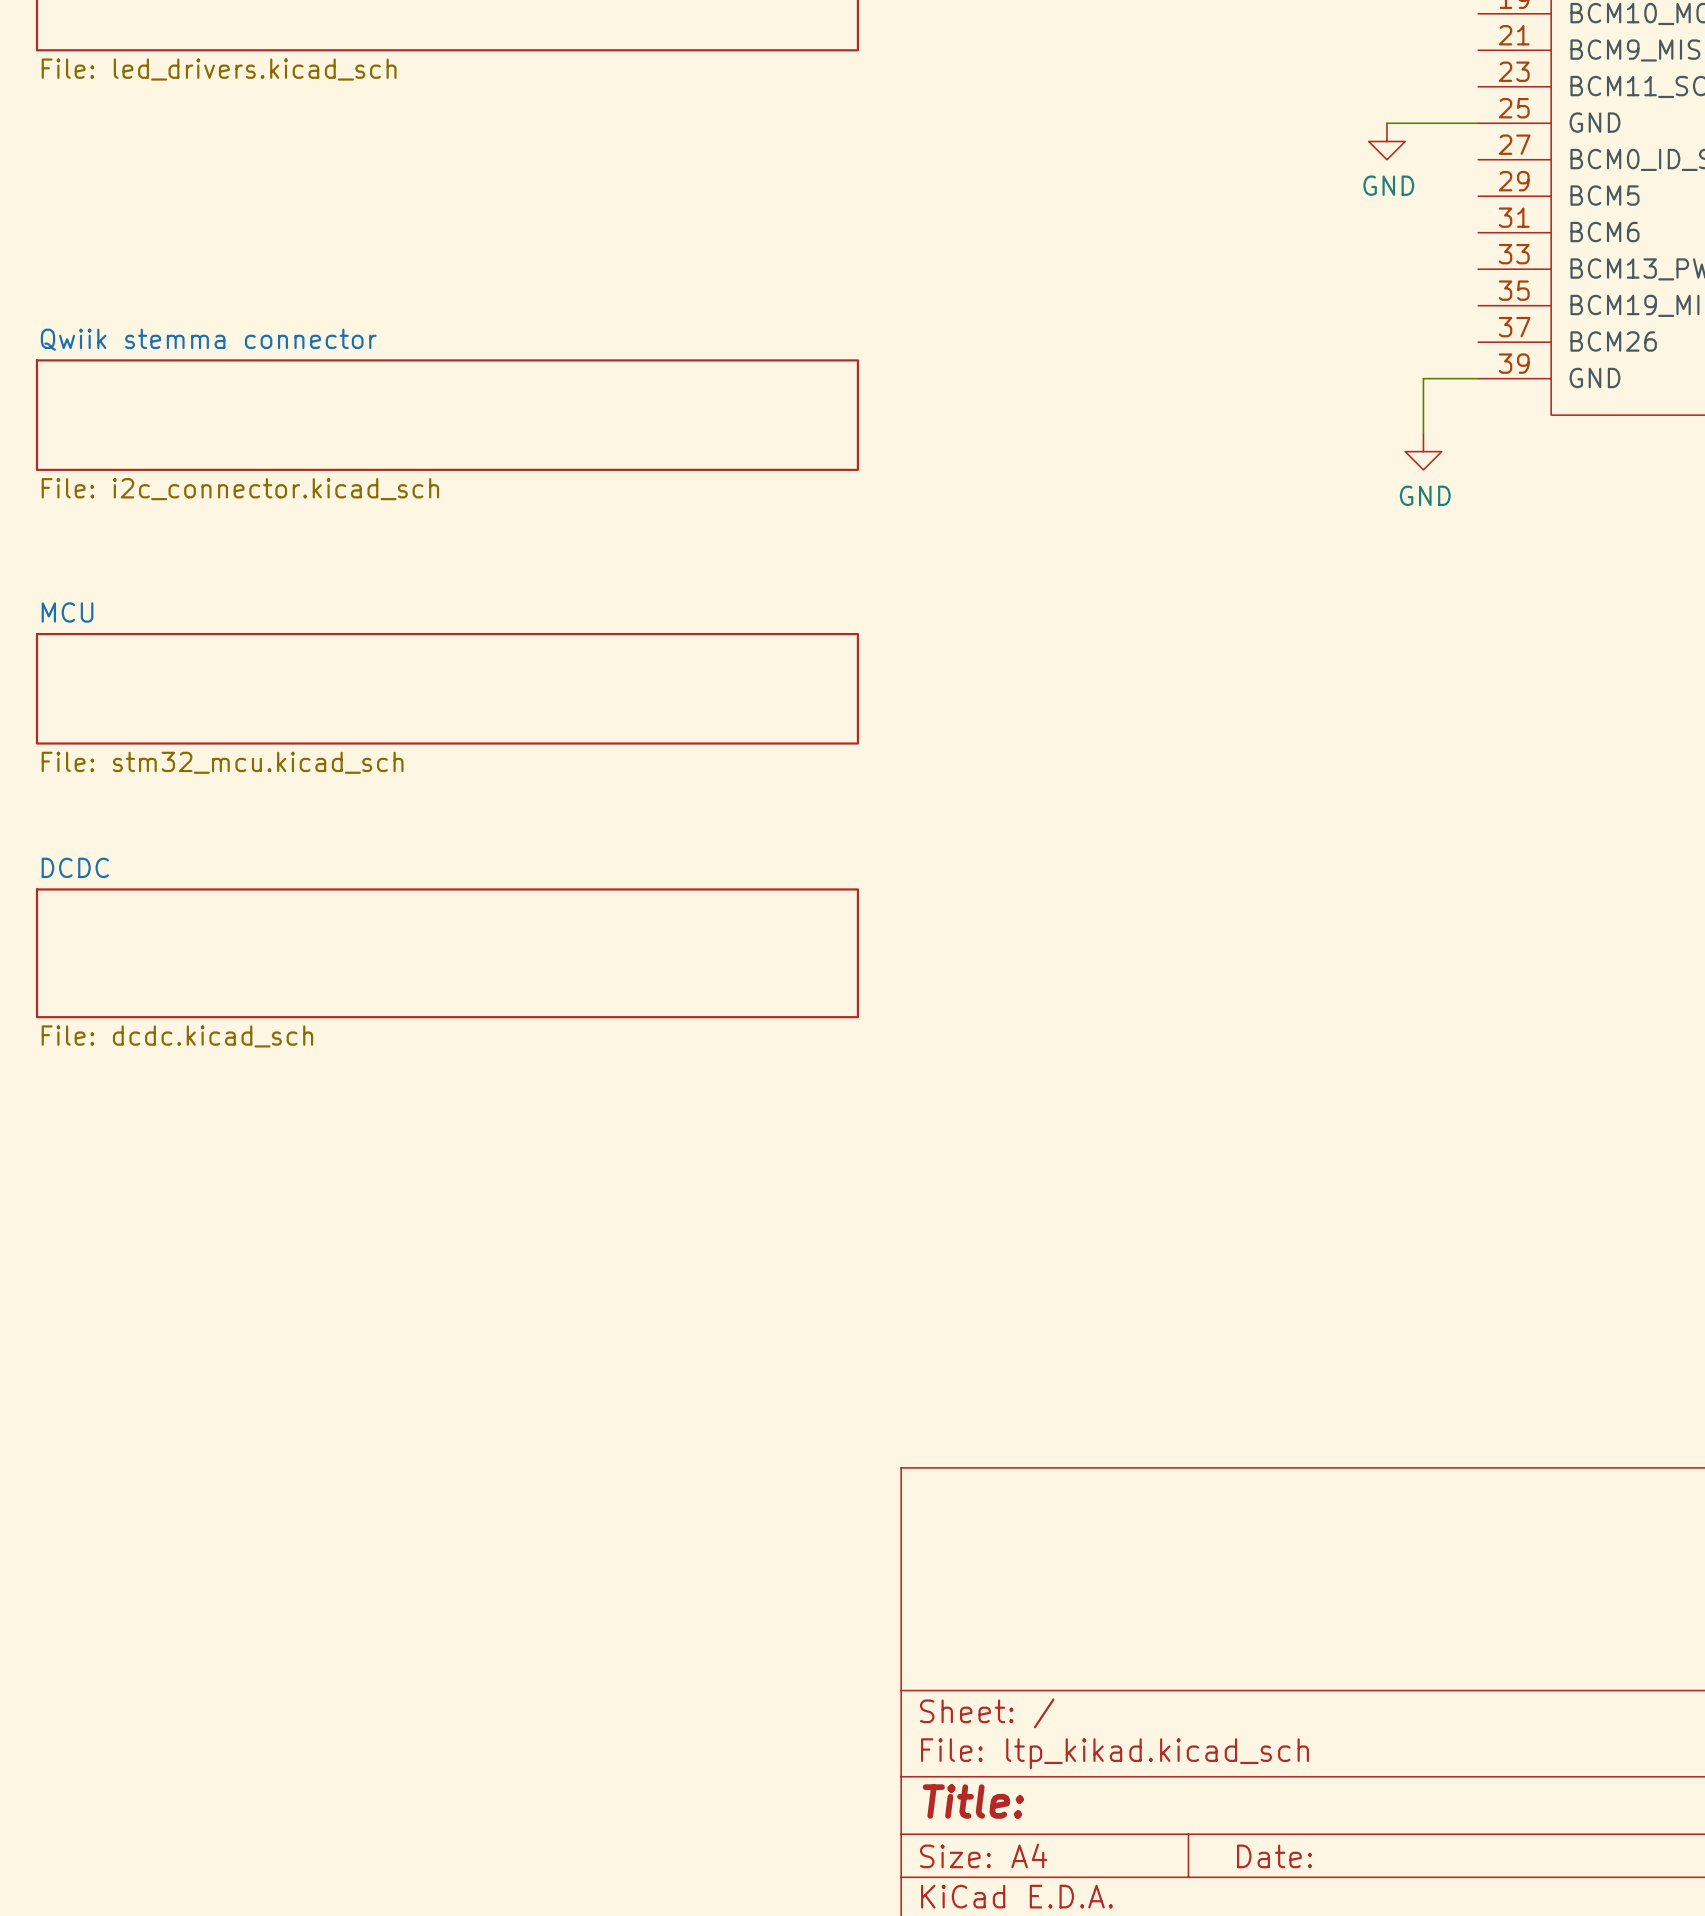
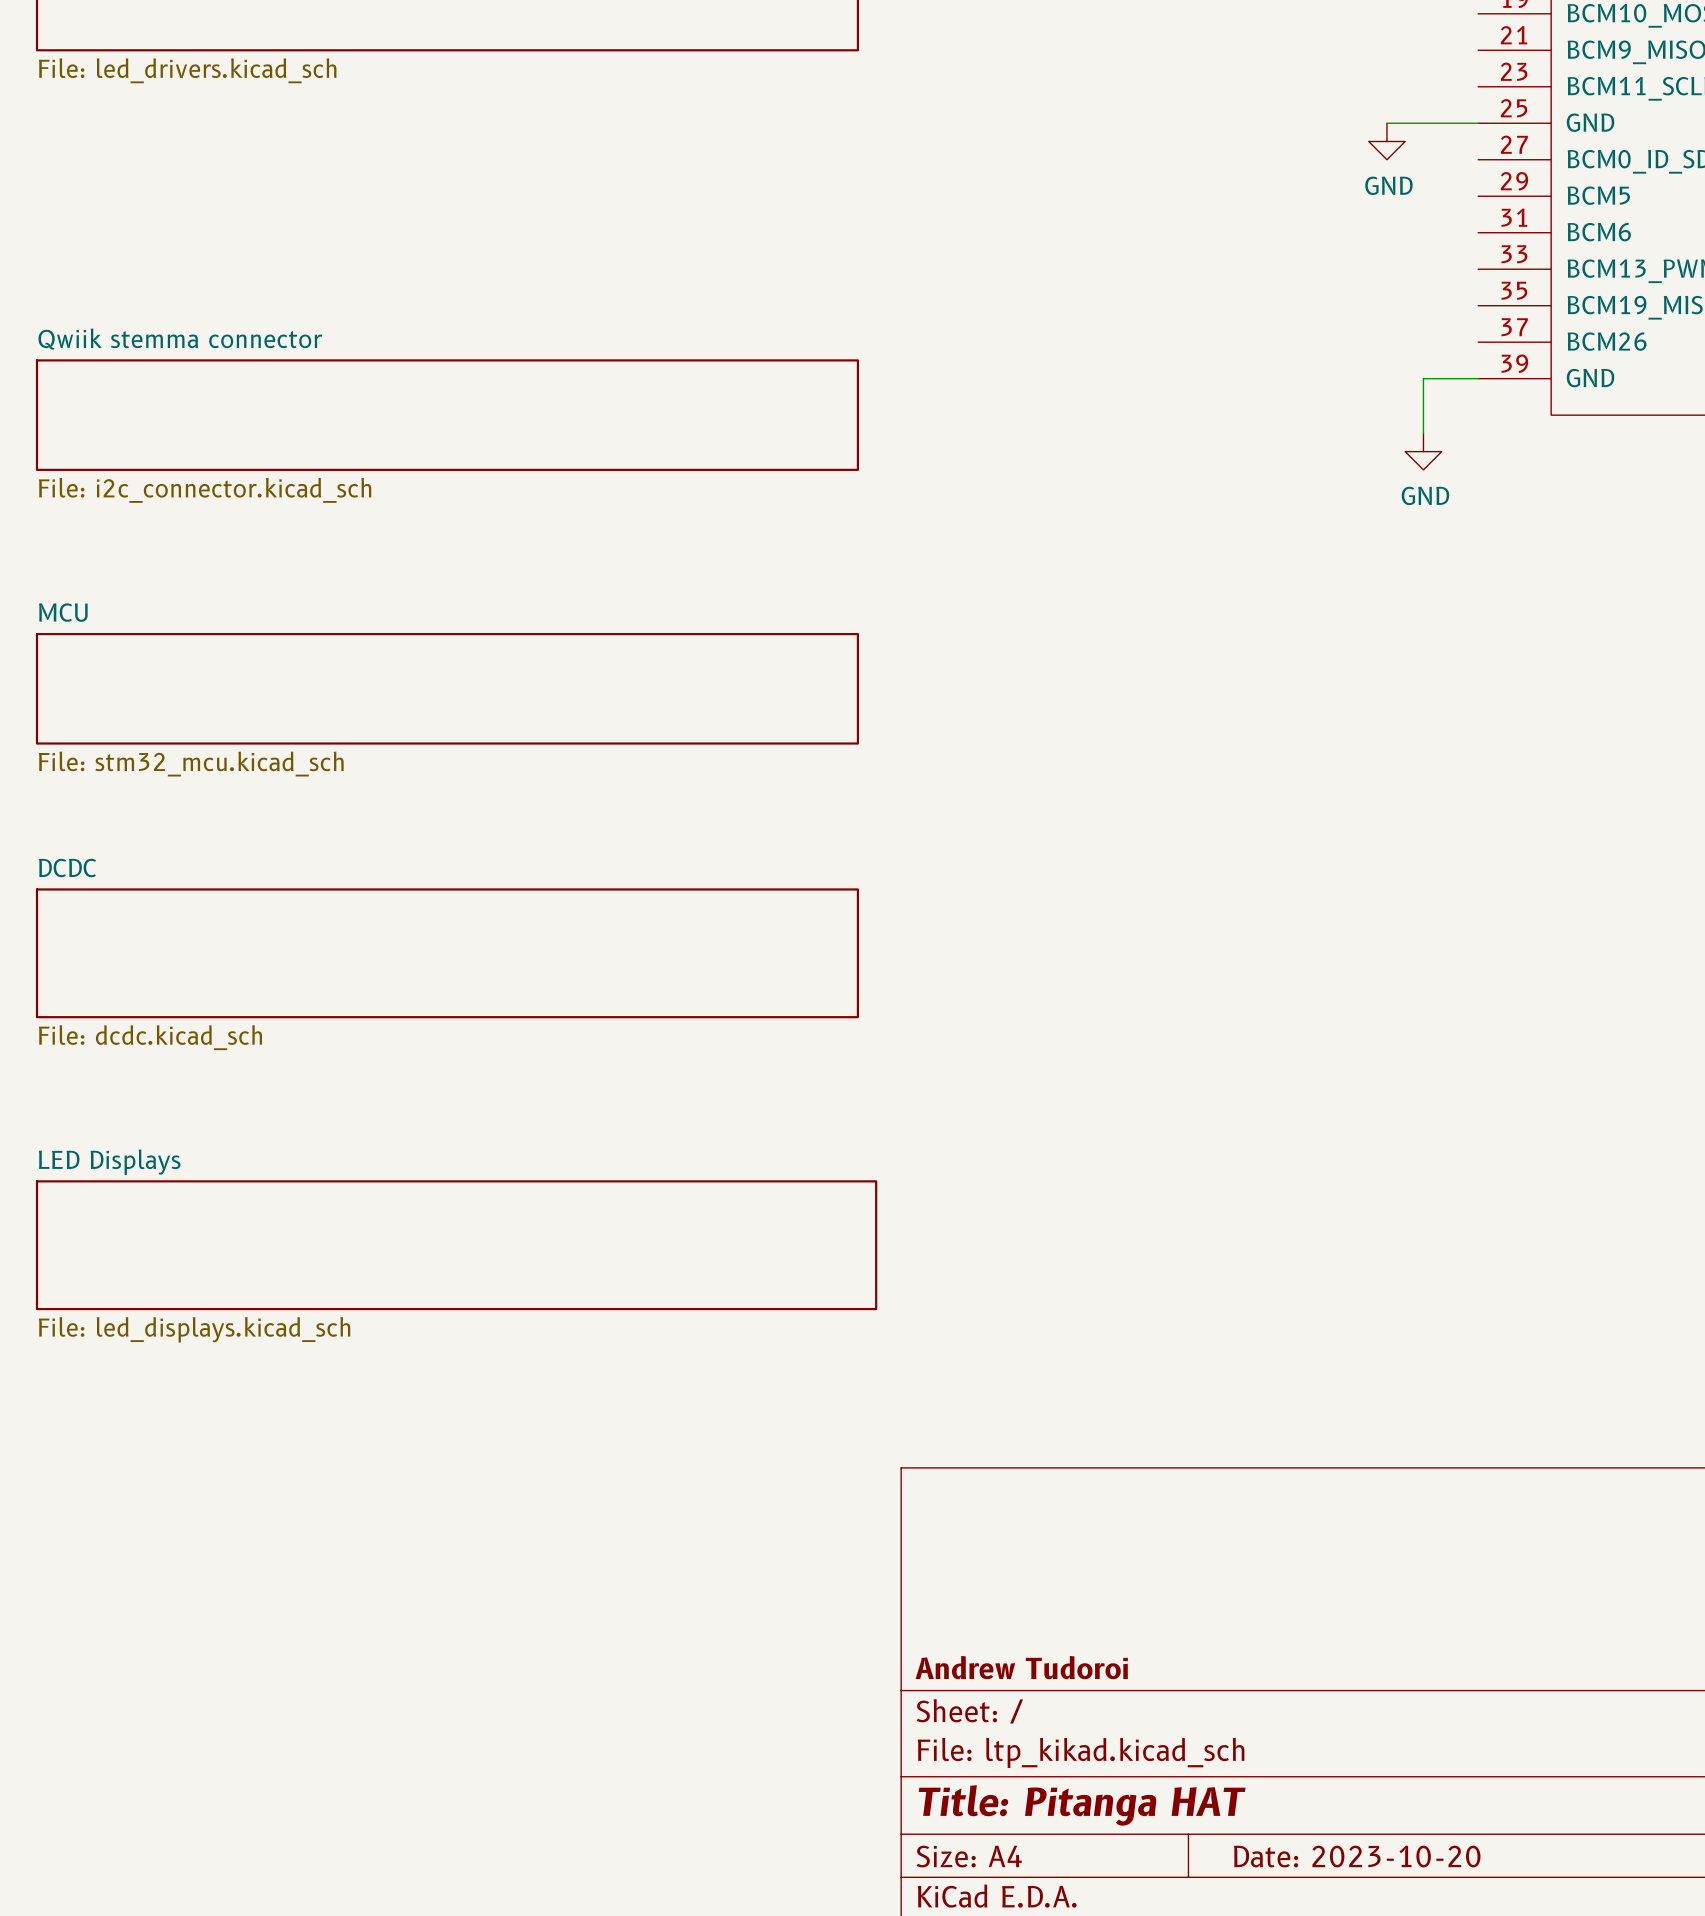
sheet LED Displays: none -> File: led_displays.kicad_sch (456, 1245)
title block: none -> Andrew Tudoroi (1021, 1667)
title block: Title: (973, 1801) -> Title: Pitanga HAT (1082, 1805)
title block: Date: (1274, 1856) -> Date: 2023-10-20 (1357, 1856)

